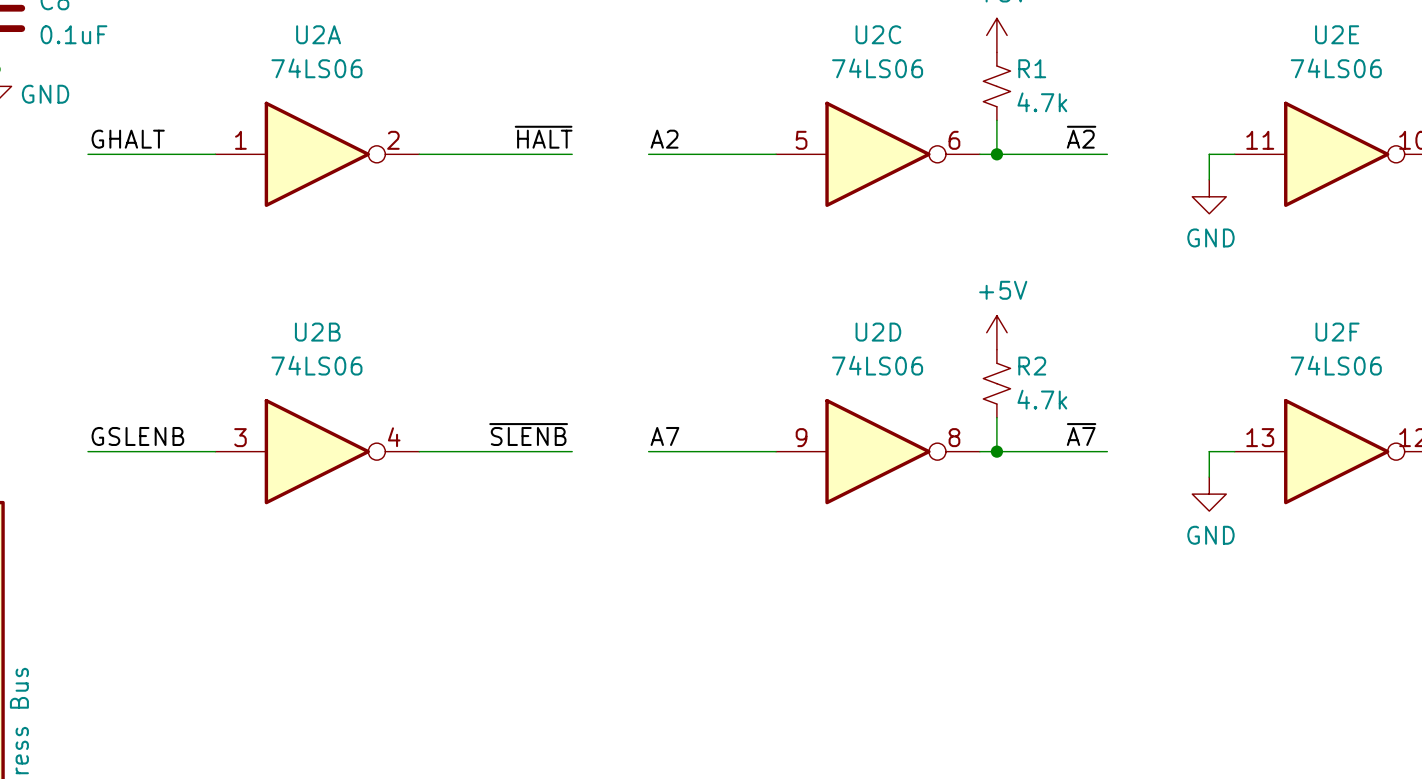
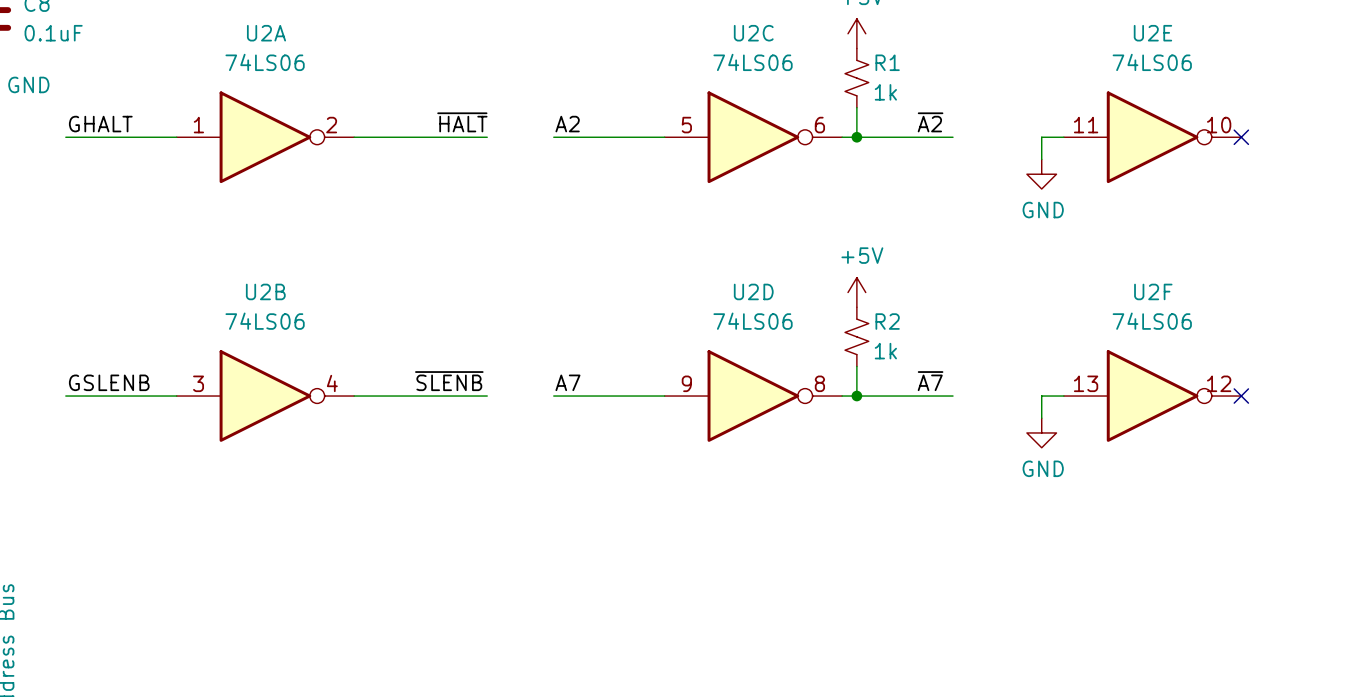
R1 value: 4.7k (1042, 102) -> 1k (885, 92)
R2 value: 4.7k (1042, 399) -> 1k (885, 351)

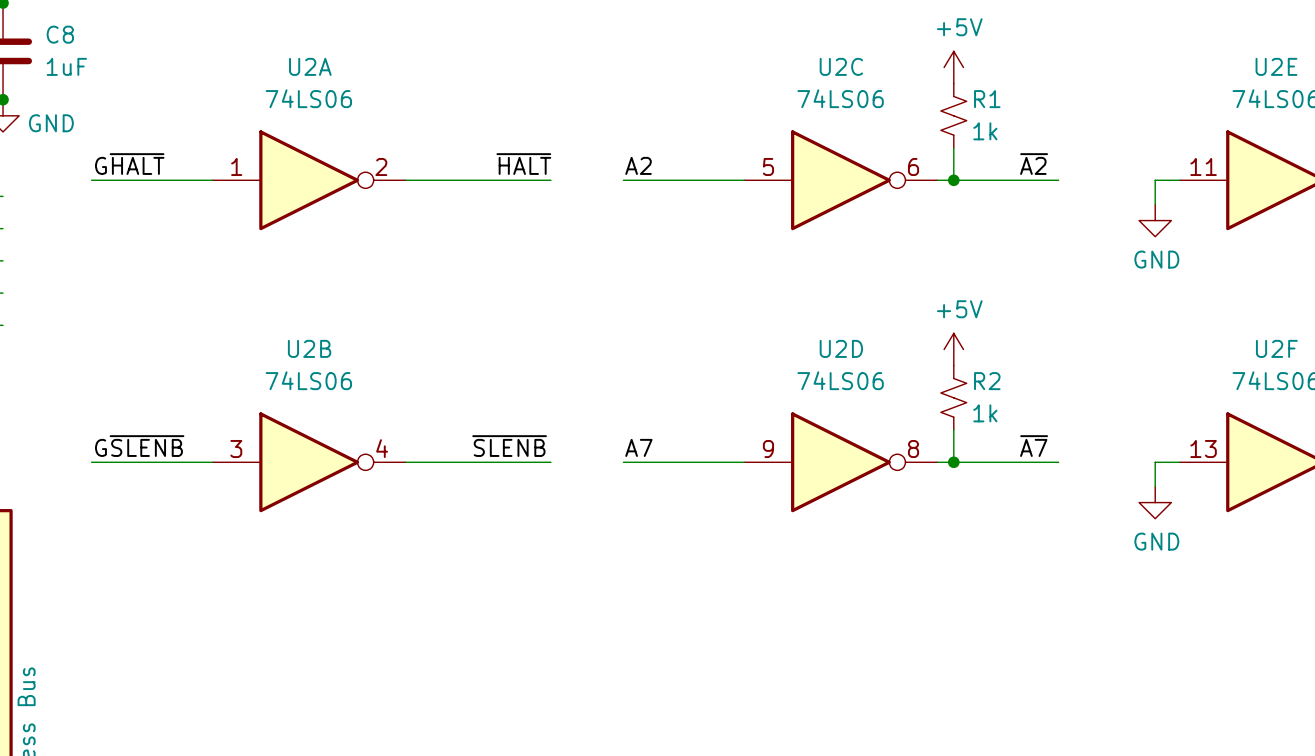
C8 value: 0.1uF (53, 33) -> 1uF (66, 66)
label: GHALT (100, 124) -> G~{HALT} (129, 164)
label: GSLENB (109, 382) -> G~{SLENB} (139, 446)

